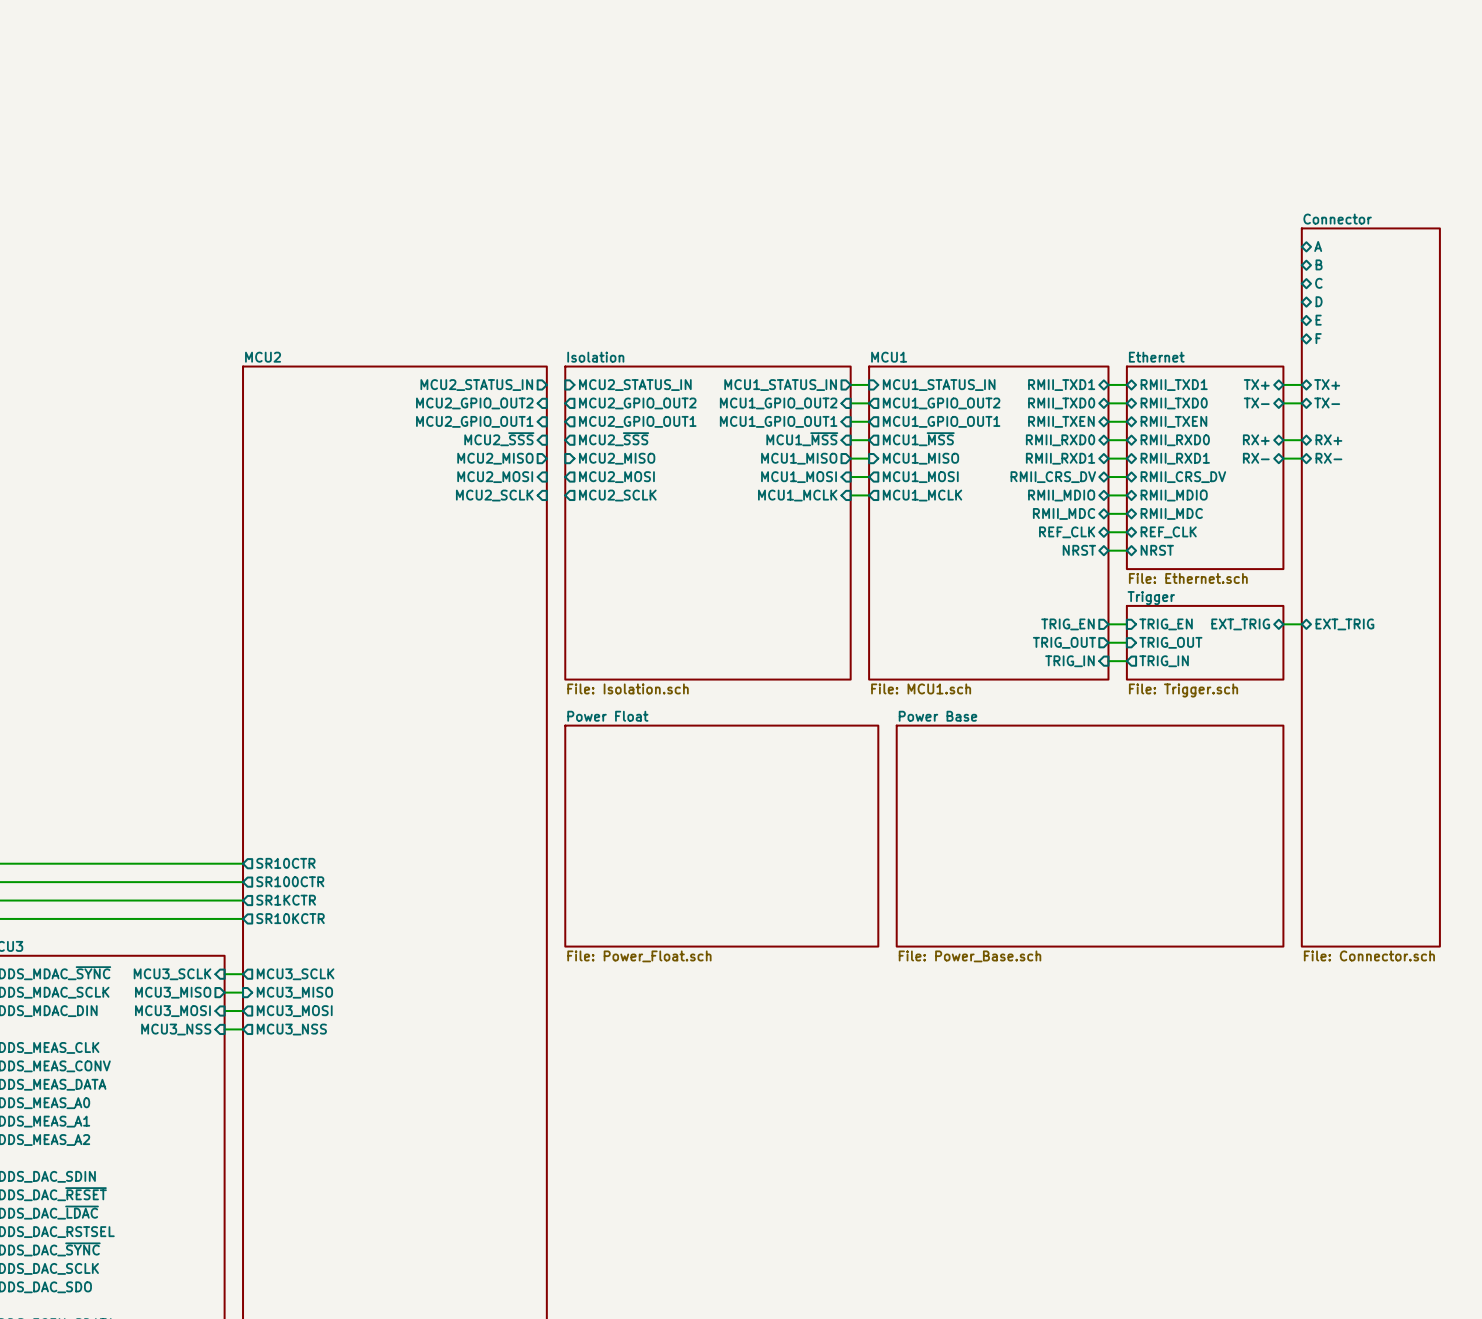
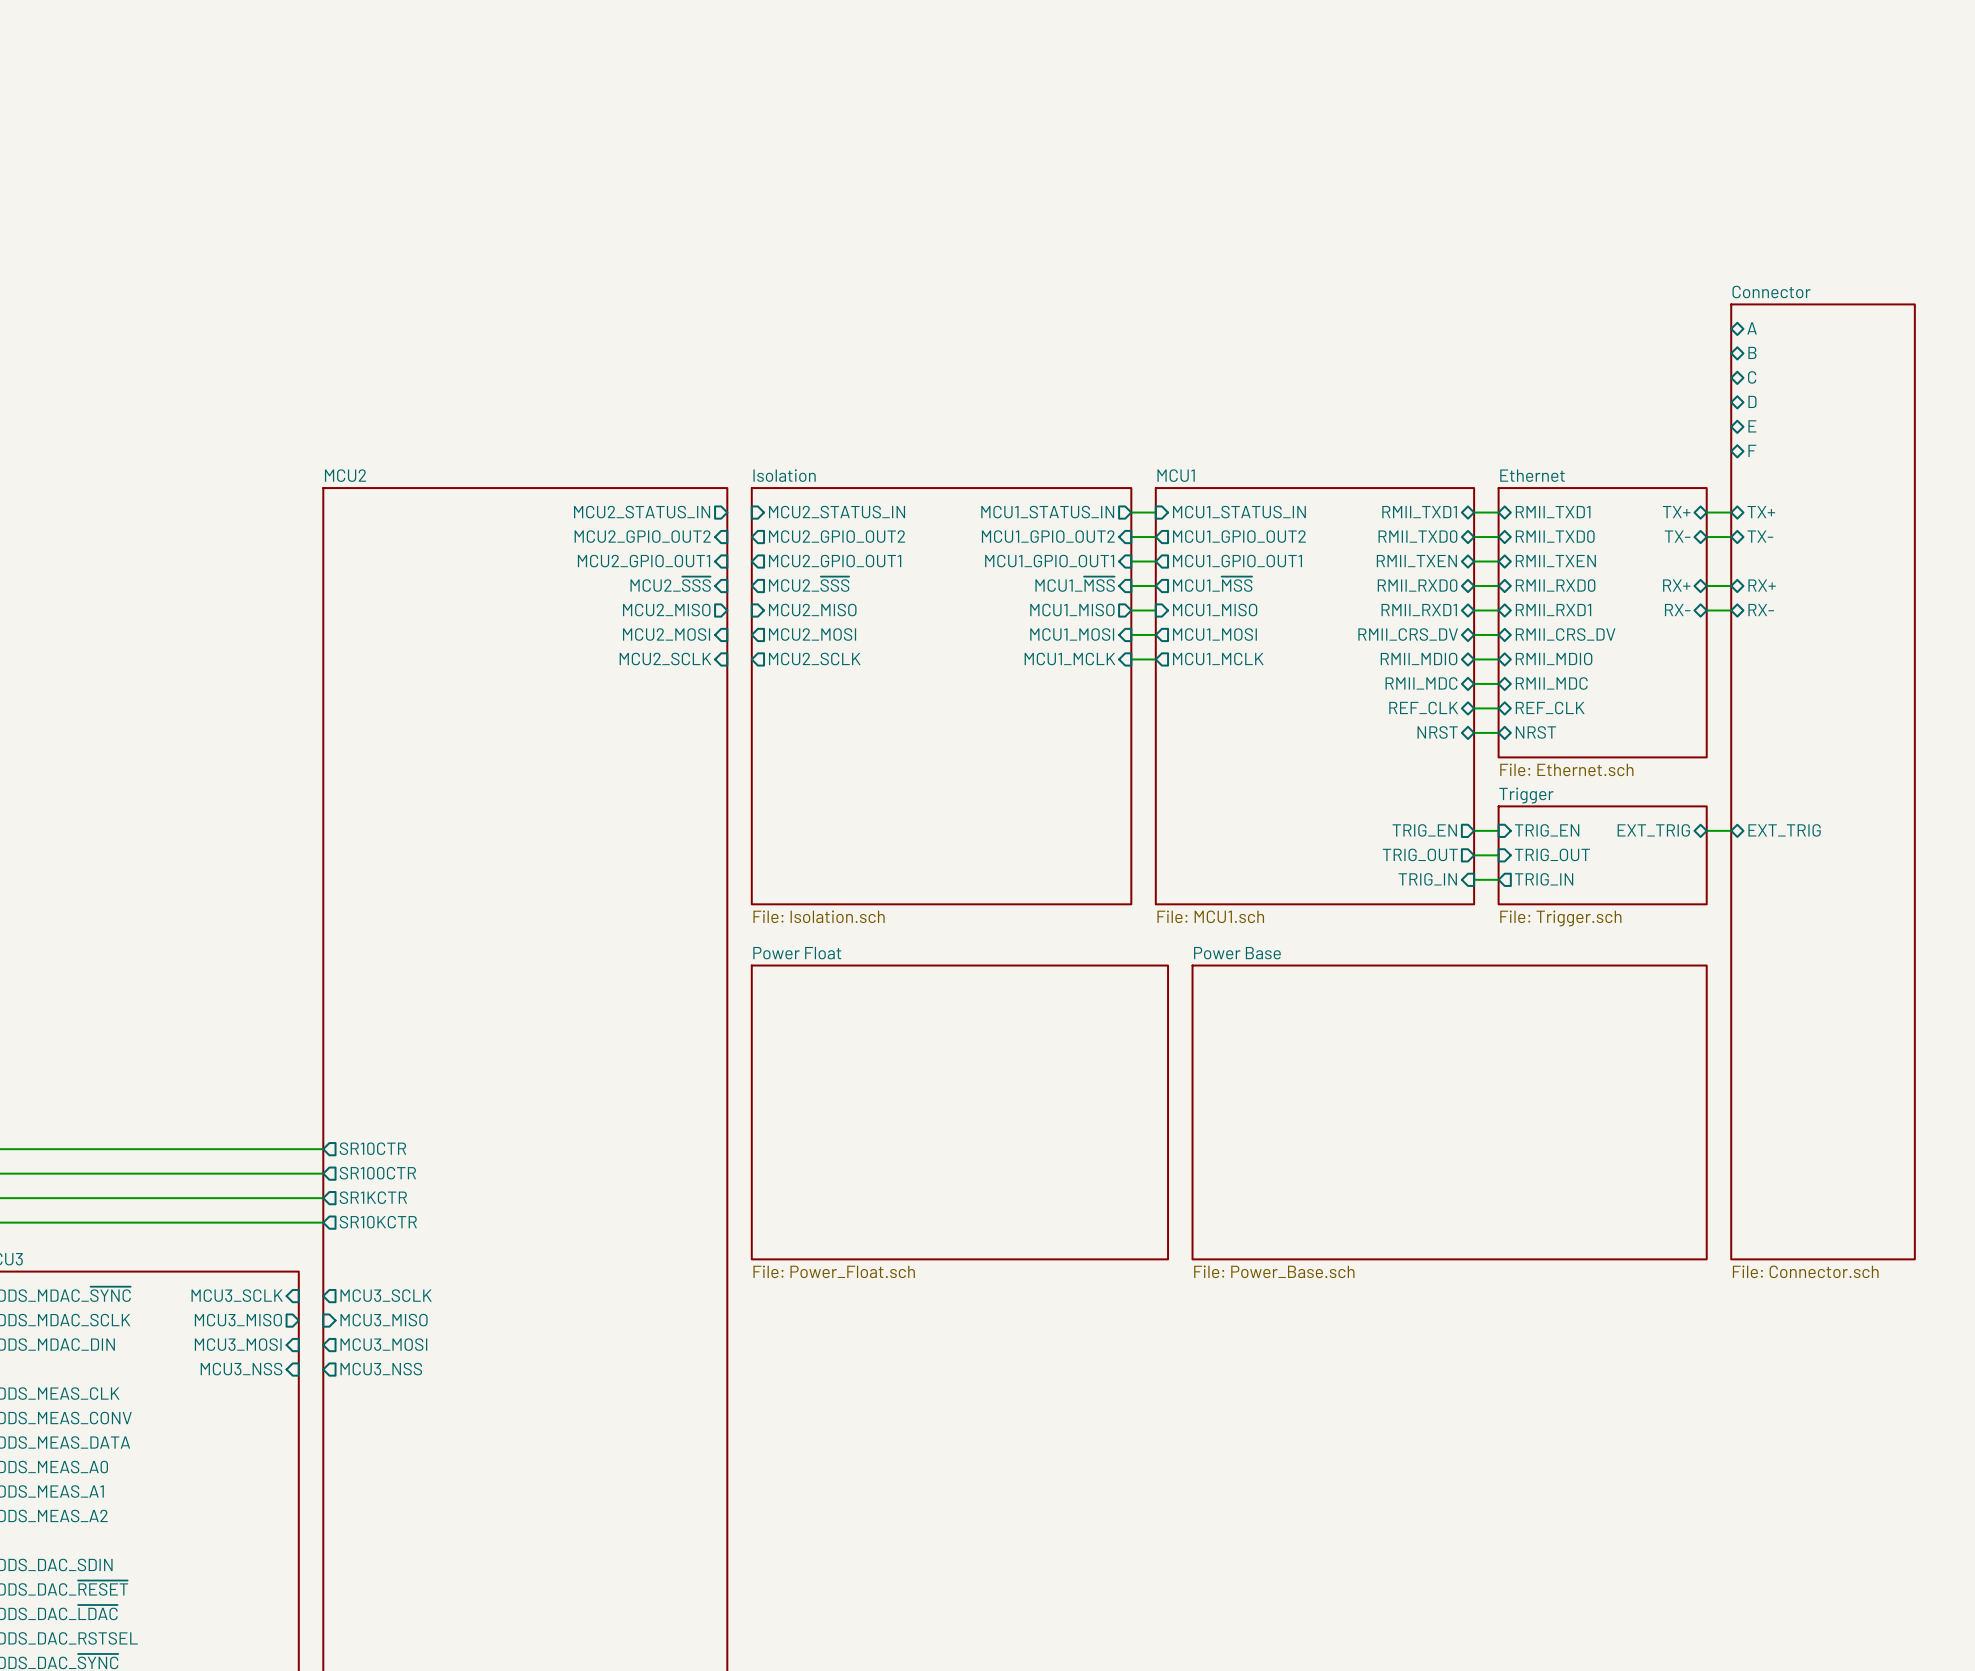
wire: (224, 974) (243, 974) -> none
wire: (224, 992) (243, 992) -> none
wire: (224, 1011) (243, 1011) -> none
wire: (224, 1029) (243, 1029) -> none

